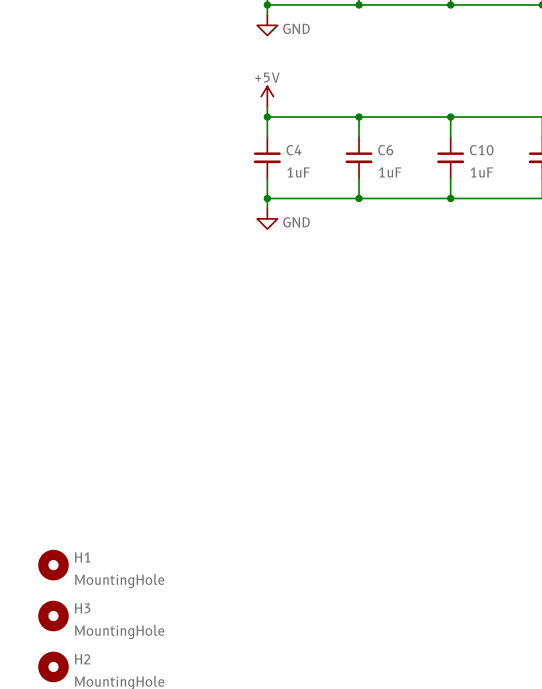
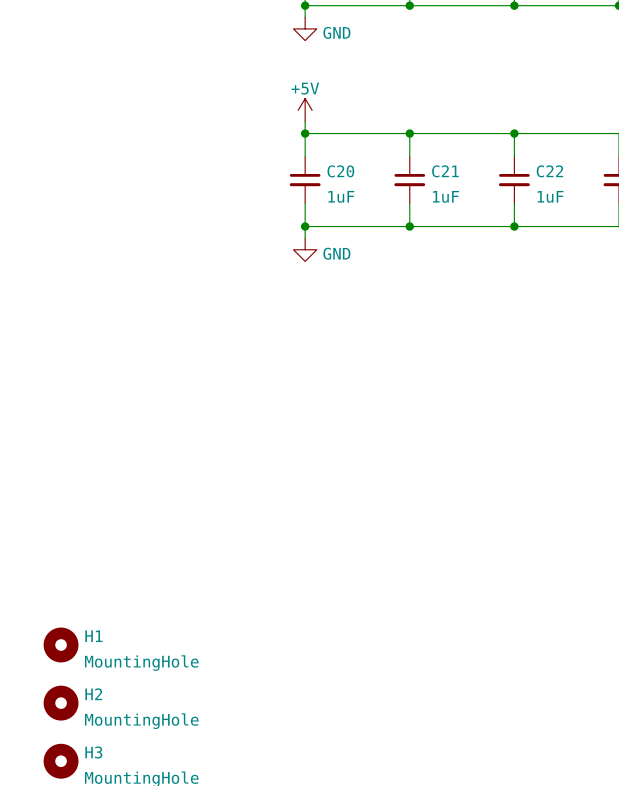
C4 name: C4 (294, 150) -> C20 (340, 171)
C6 name: C6 (385, 150) -> C21 (445, 171)
C10 name: C10 (481, 150) -> C22 (549, 171)
H3 name: H3 (82, 608) -> H2 (93, 694)
H2 name: H2 (82, 659) -> H3 (93, 752)

